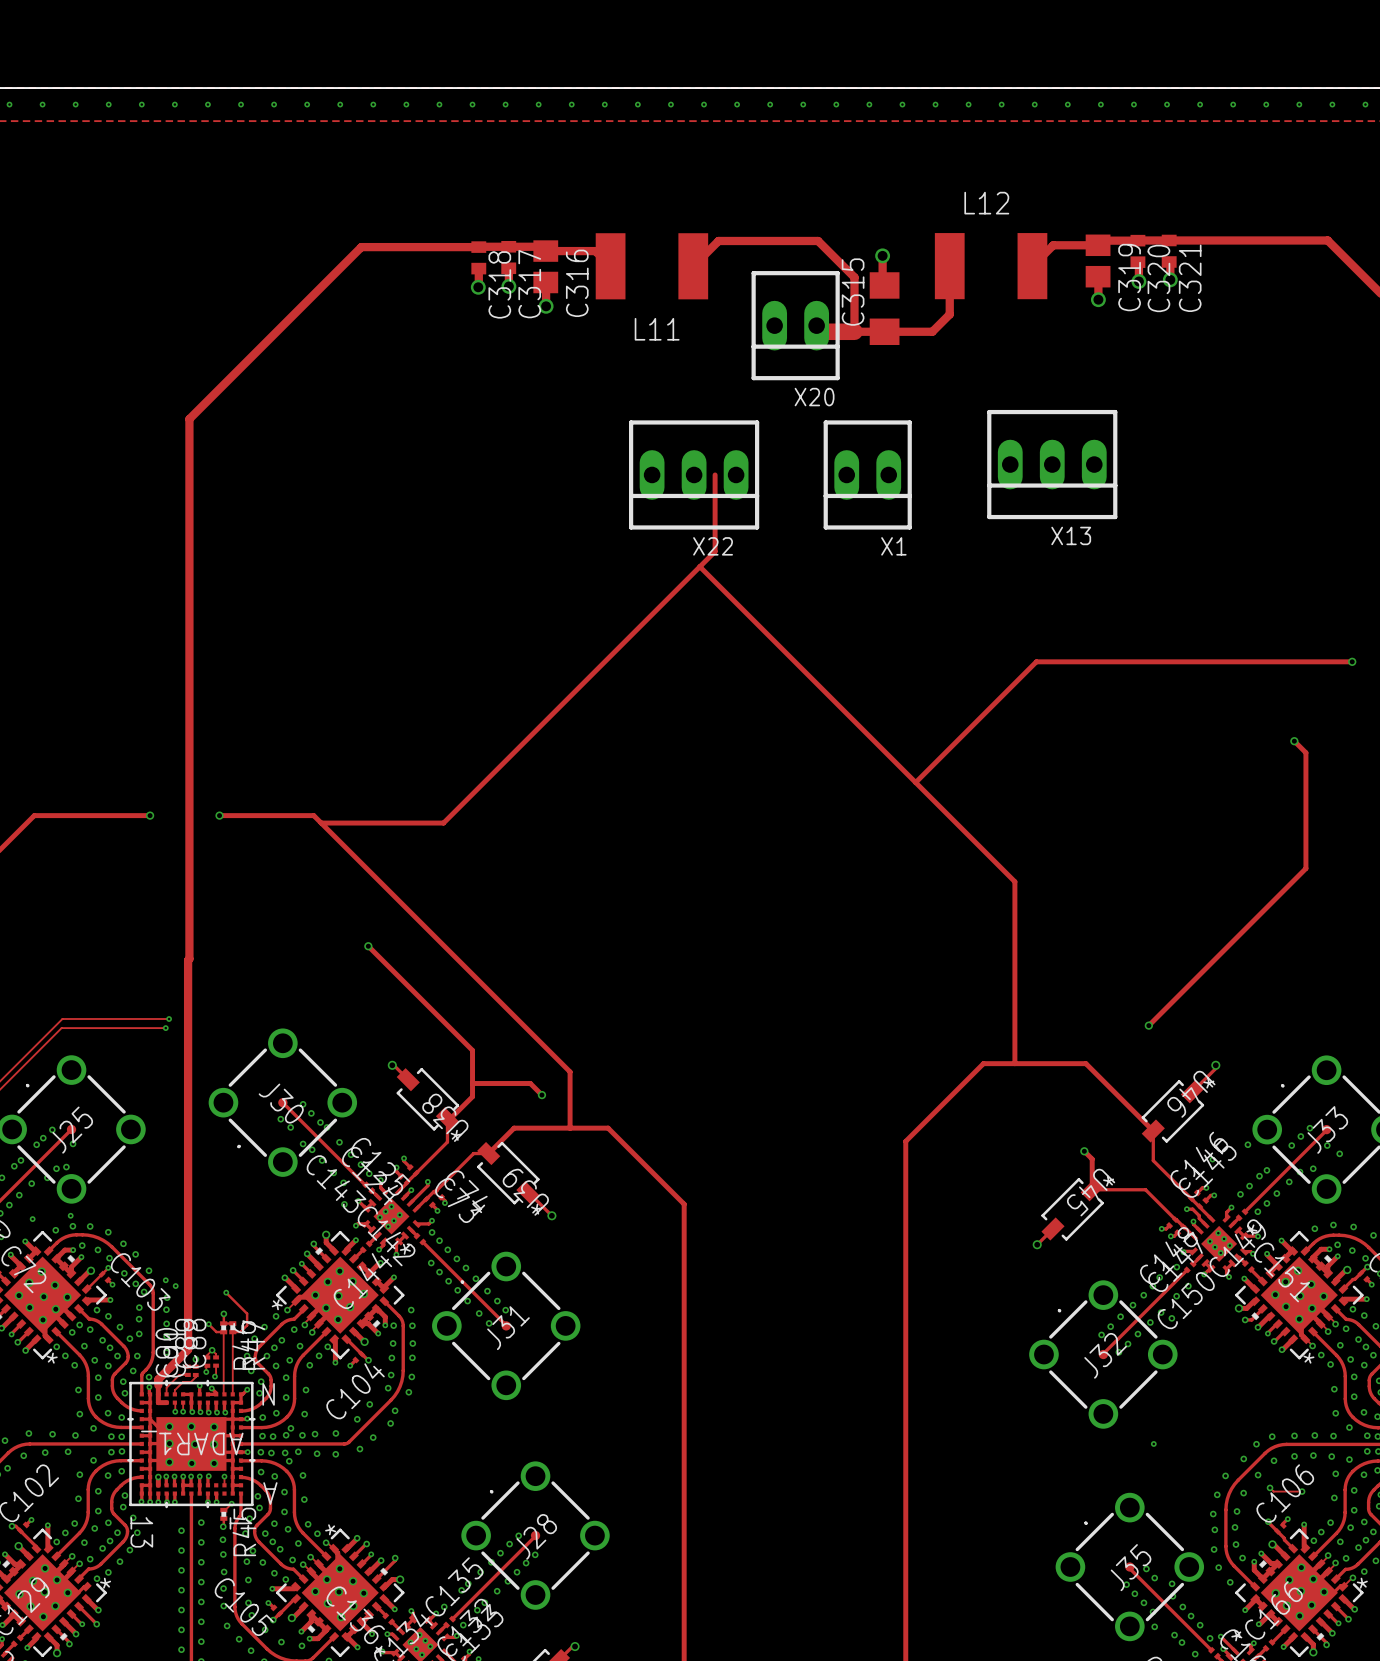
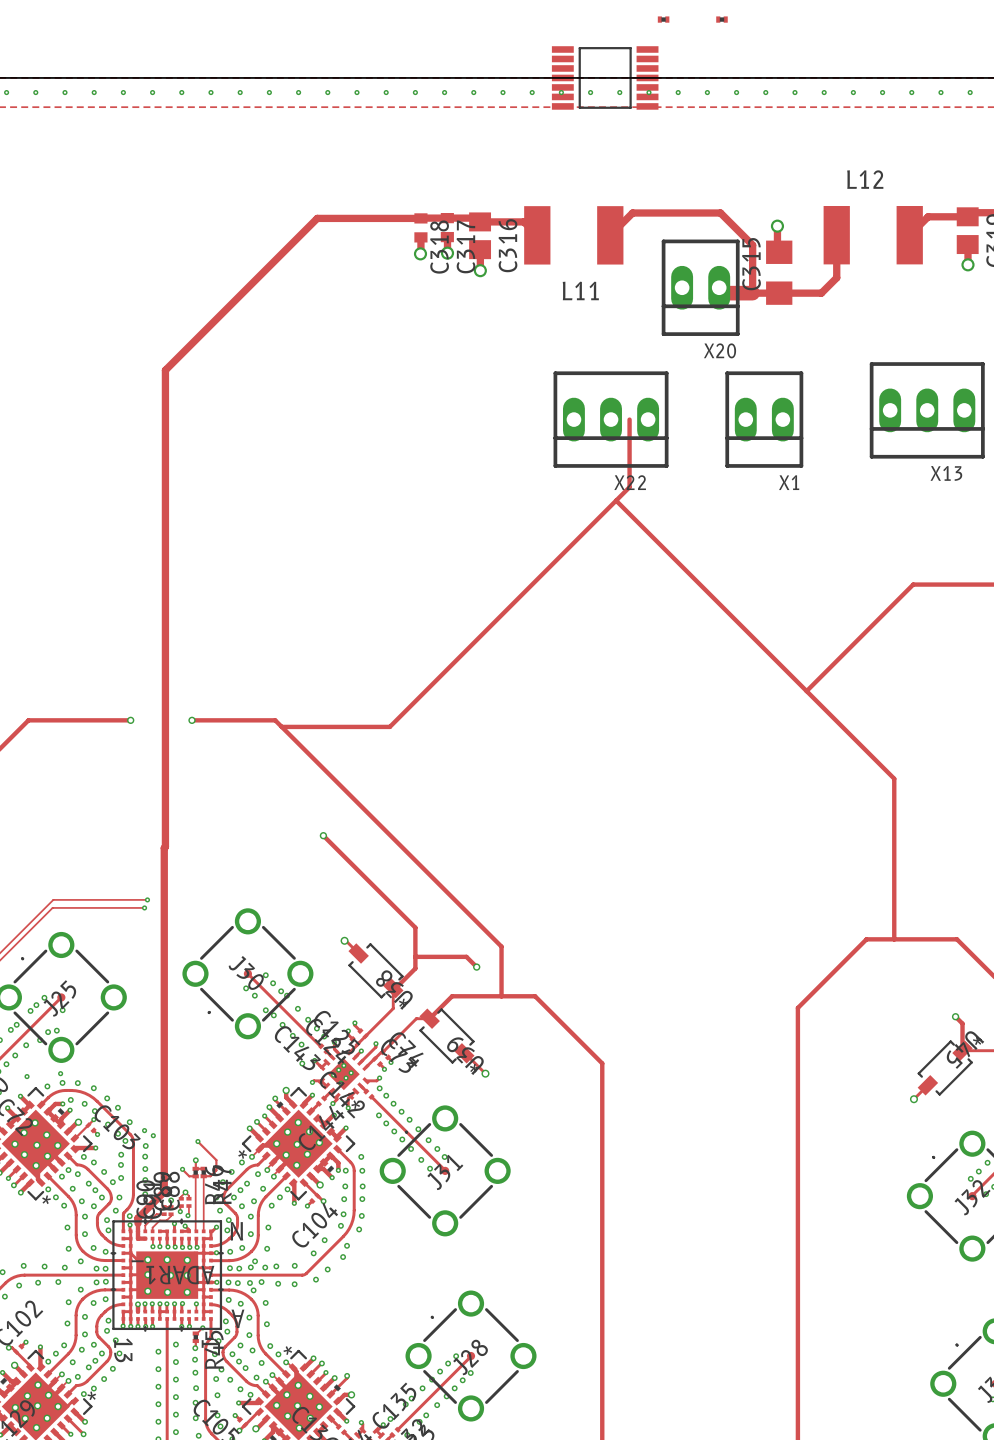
part: none -> (663, 19)
part: none -> (721, 19)
part: none -> (605, 77)

